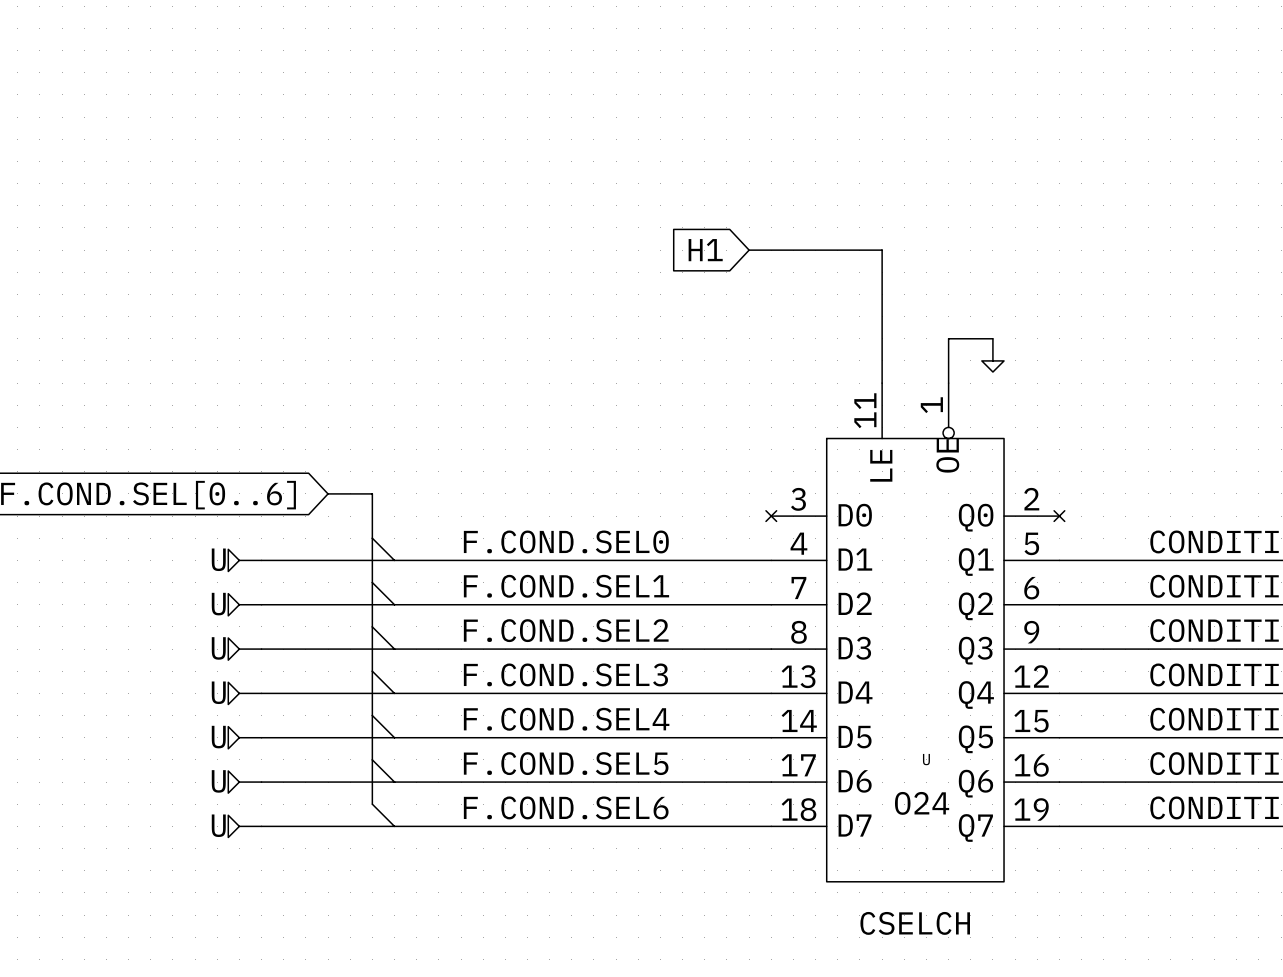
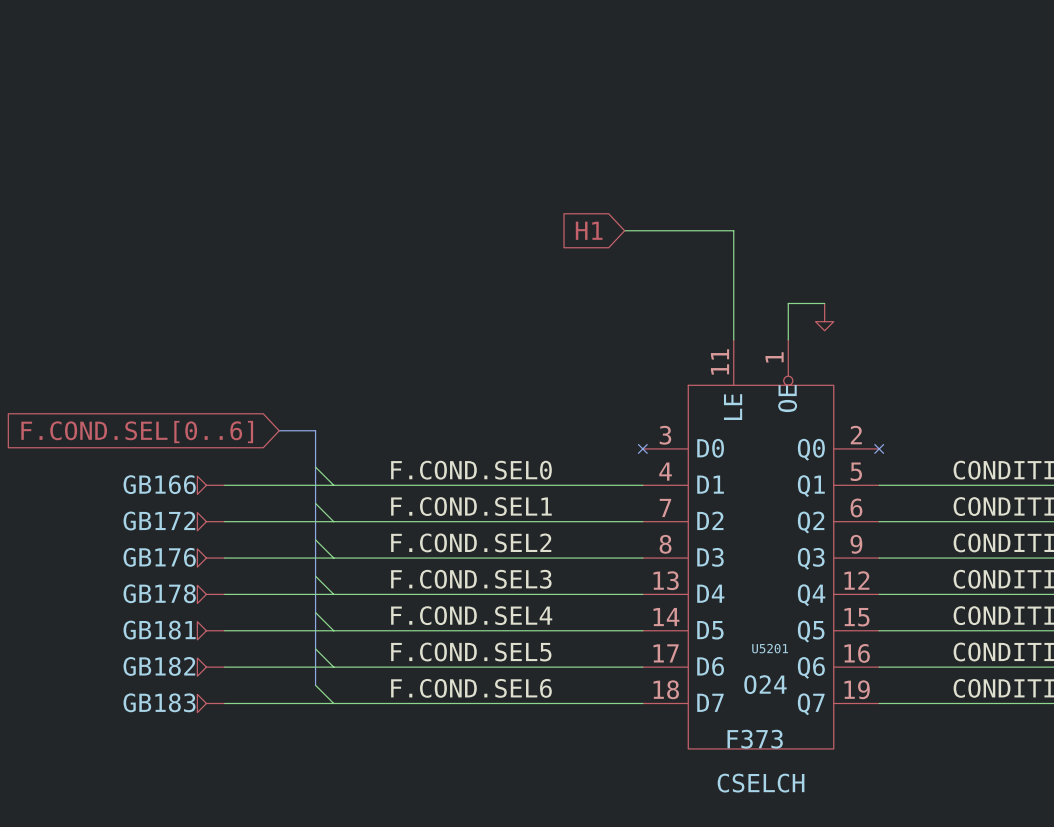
U name: U (218, 559) -> GB166 (159, 484)
U name: U (218, 604) -> GB172 (159, 521)
U name: U (218, 648) -> GB176 (159, 557)
U name: U (218, 692) -> GB178 (159, 593)
U name: U (218, 737) -> GB181 (159, 630)
U name: U (926, 759) -> U5201 (770, 648)
U name: U (218, 781) -> GB182 (159, 666)
U name: U (218, 825) -> GB183 (159, 702)
U value: none -> F373 (755, 739)

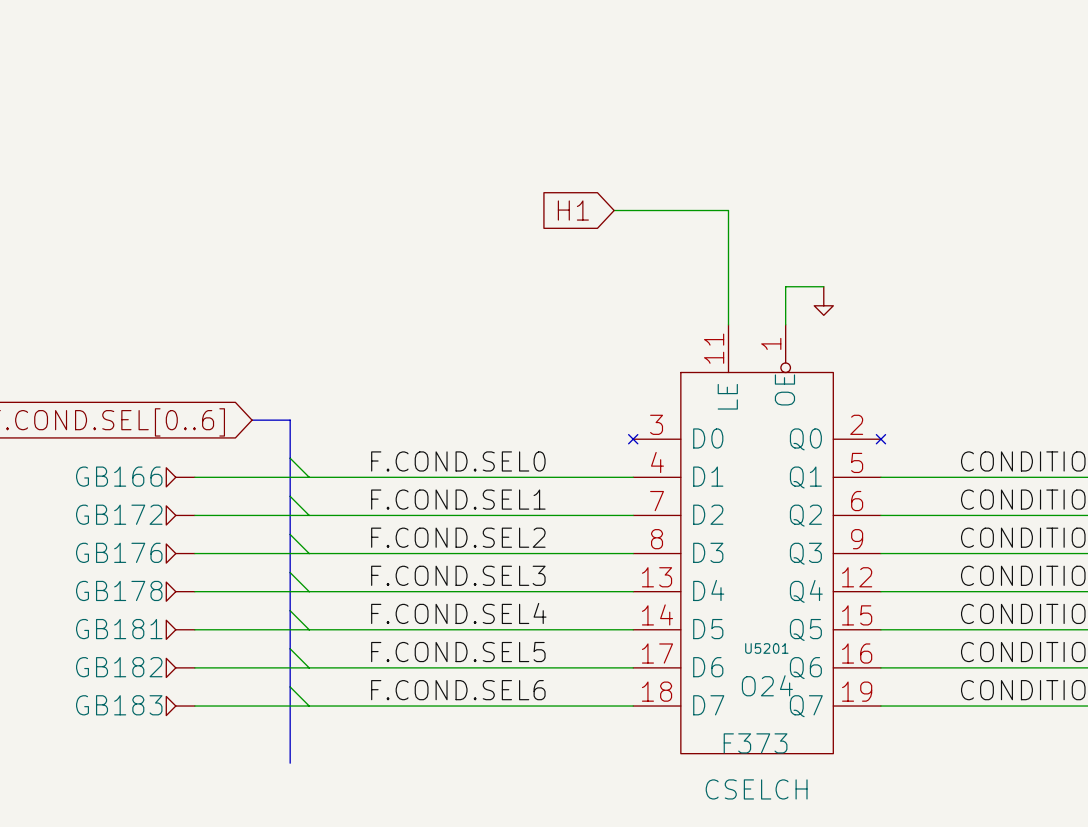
bus: none -> (290, 686) (290, 763)

